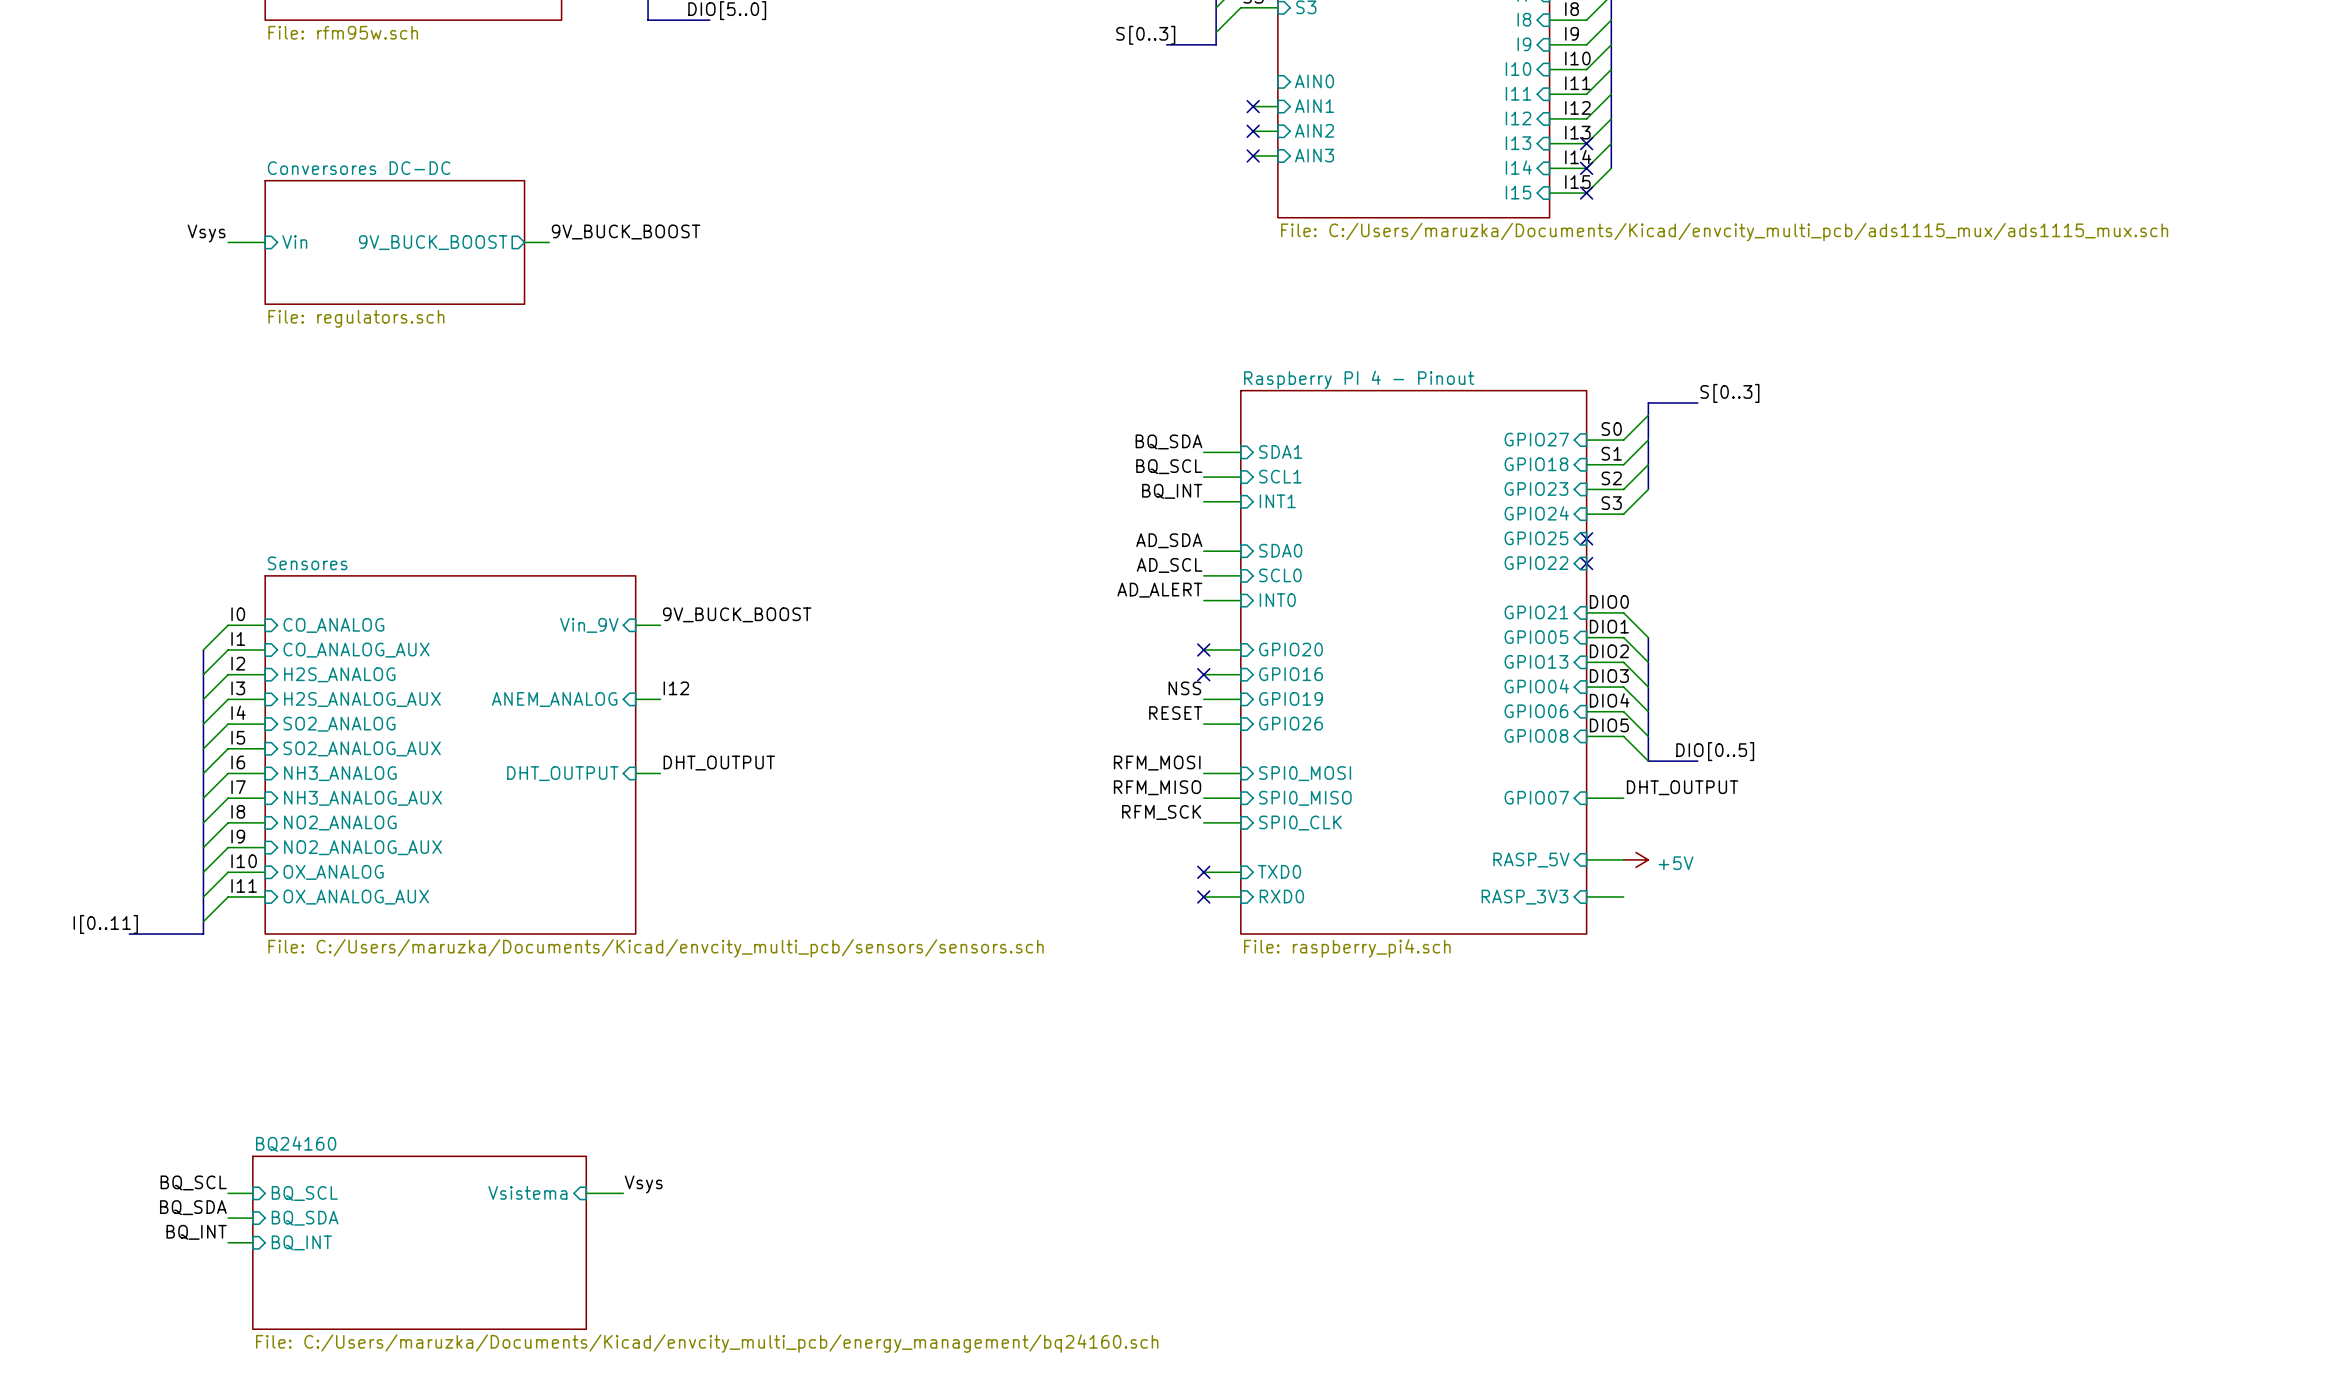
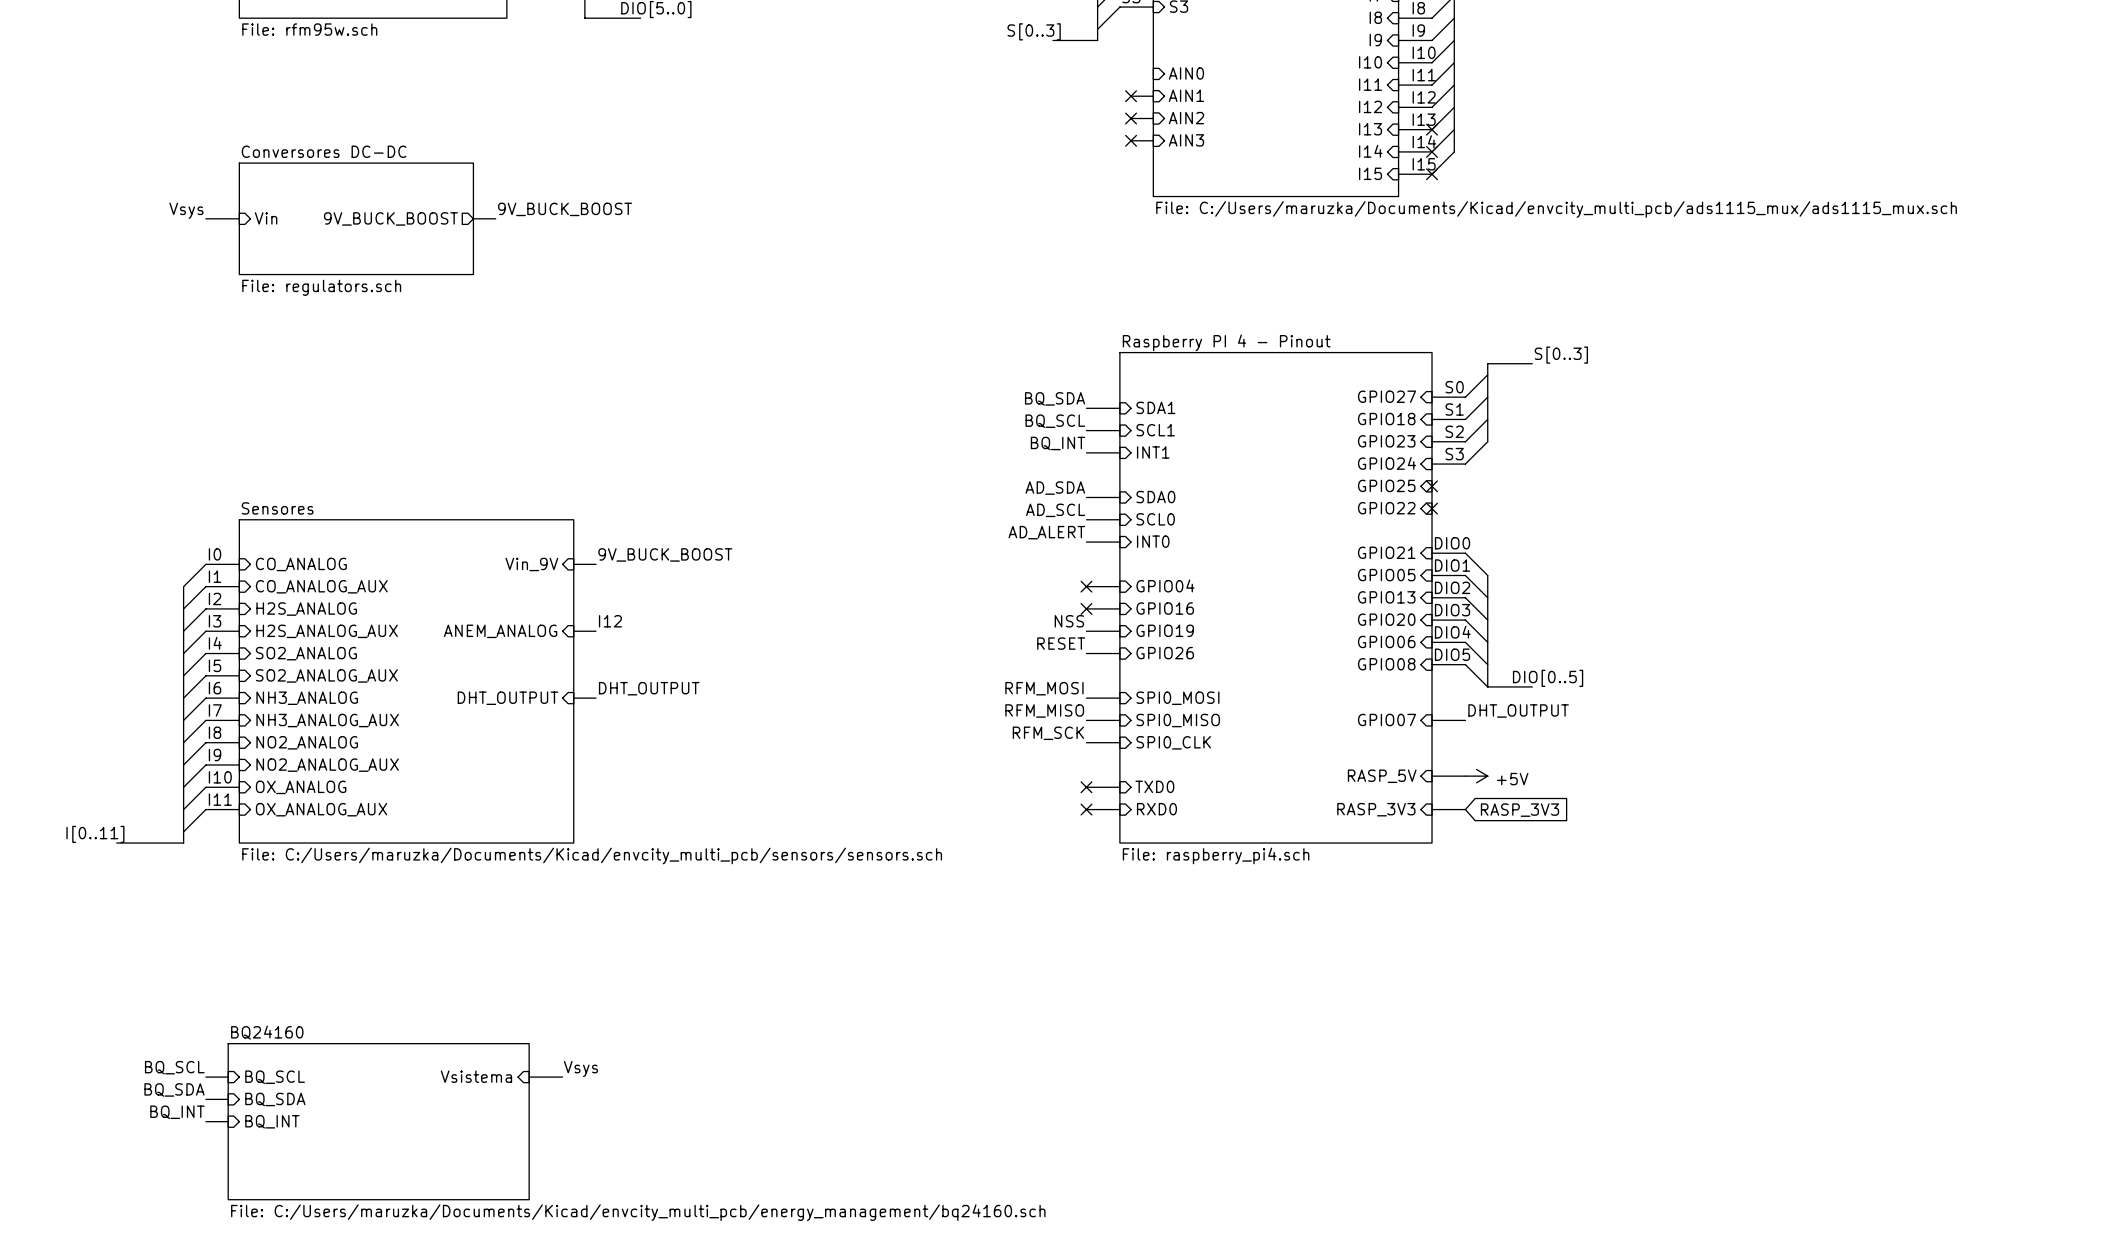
sheet pin: GPIO20 (1291, 649) -> GPIO04 (1165, 585)
sheet pin: GPIO04 (1536, 686) -> GPIO20 (1386, 619)
global label: none -> RASP_3V3 (1520, 810)

